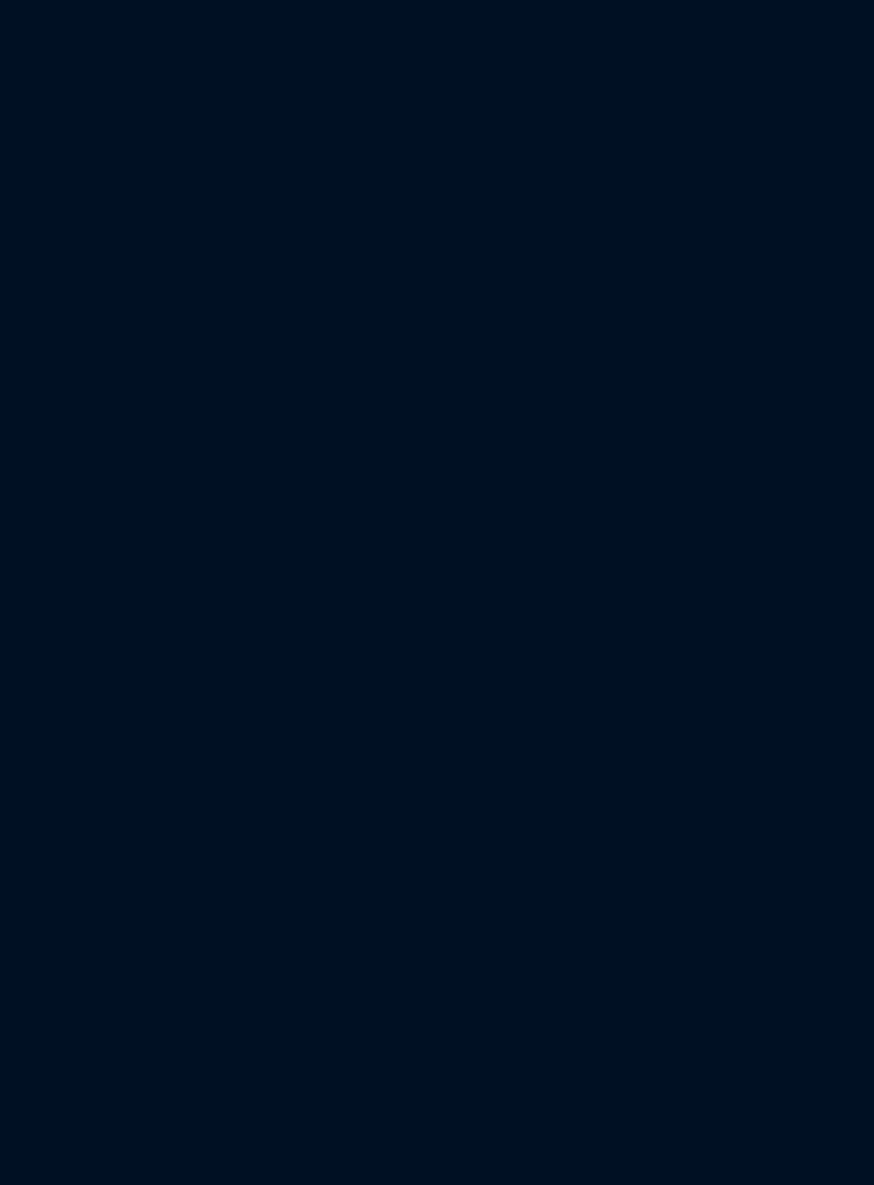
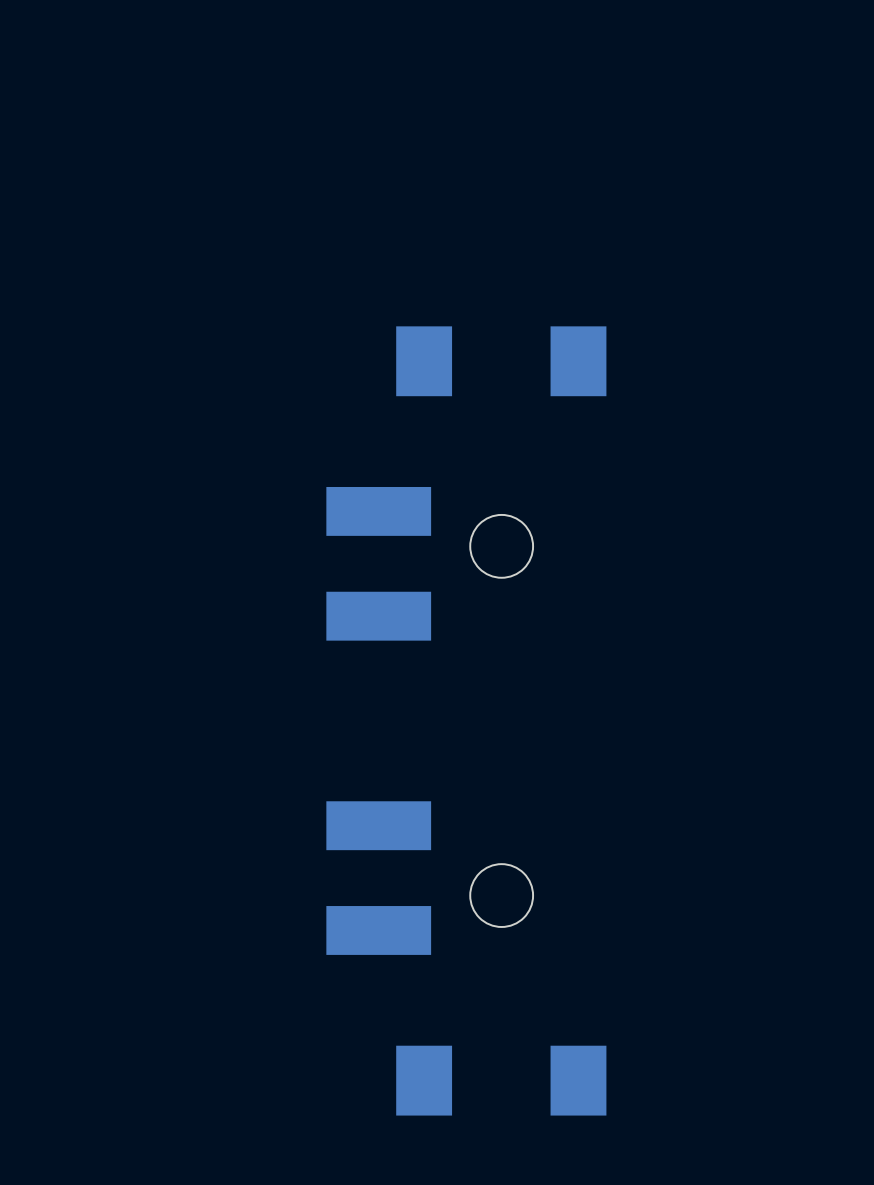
part: none -> (466, 720)

